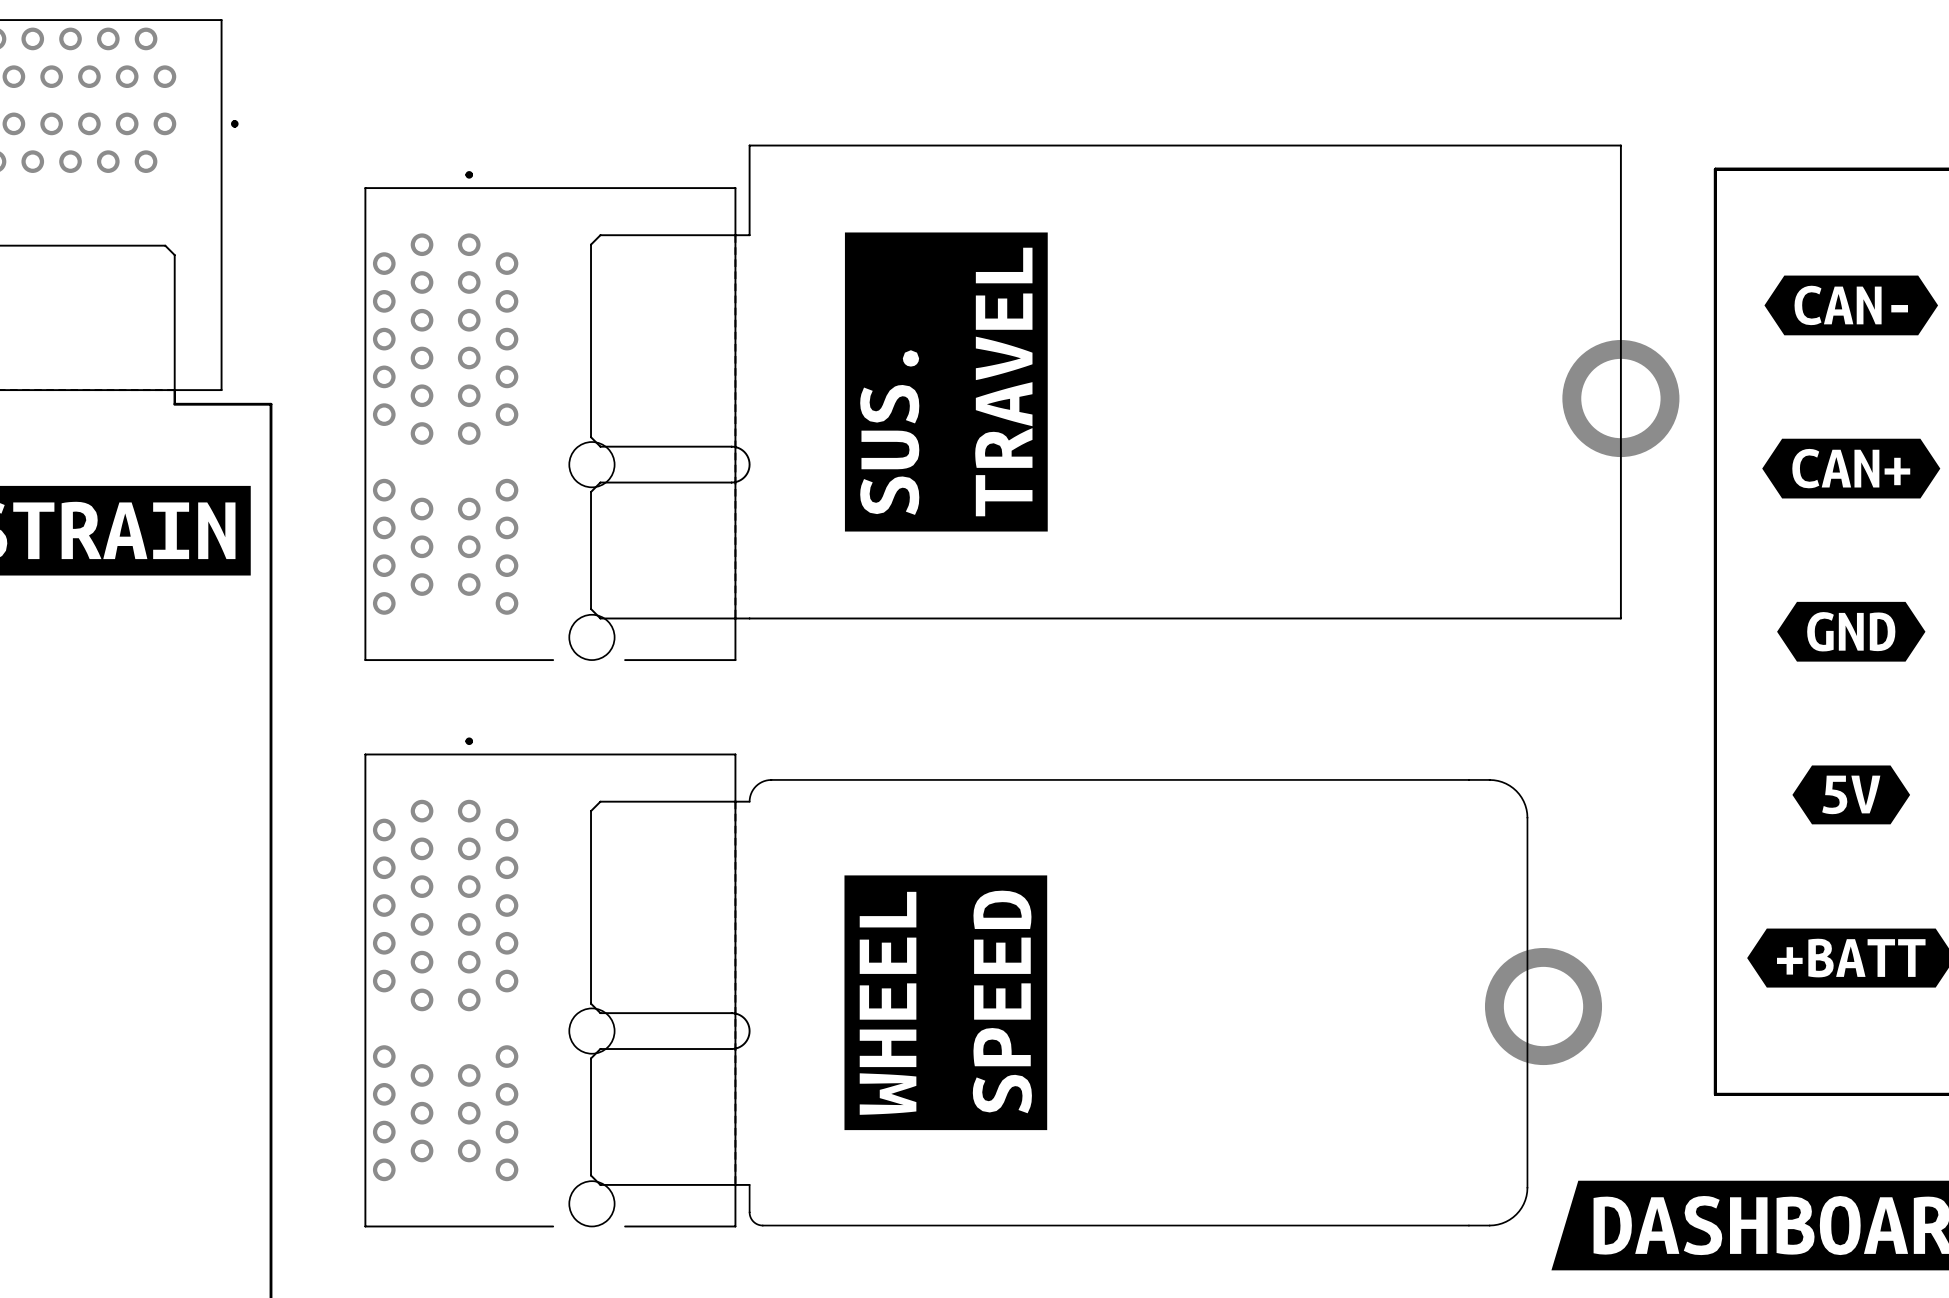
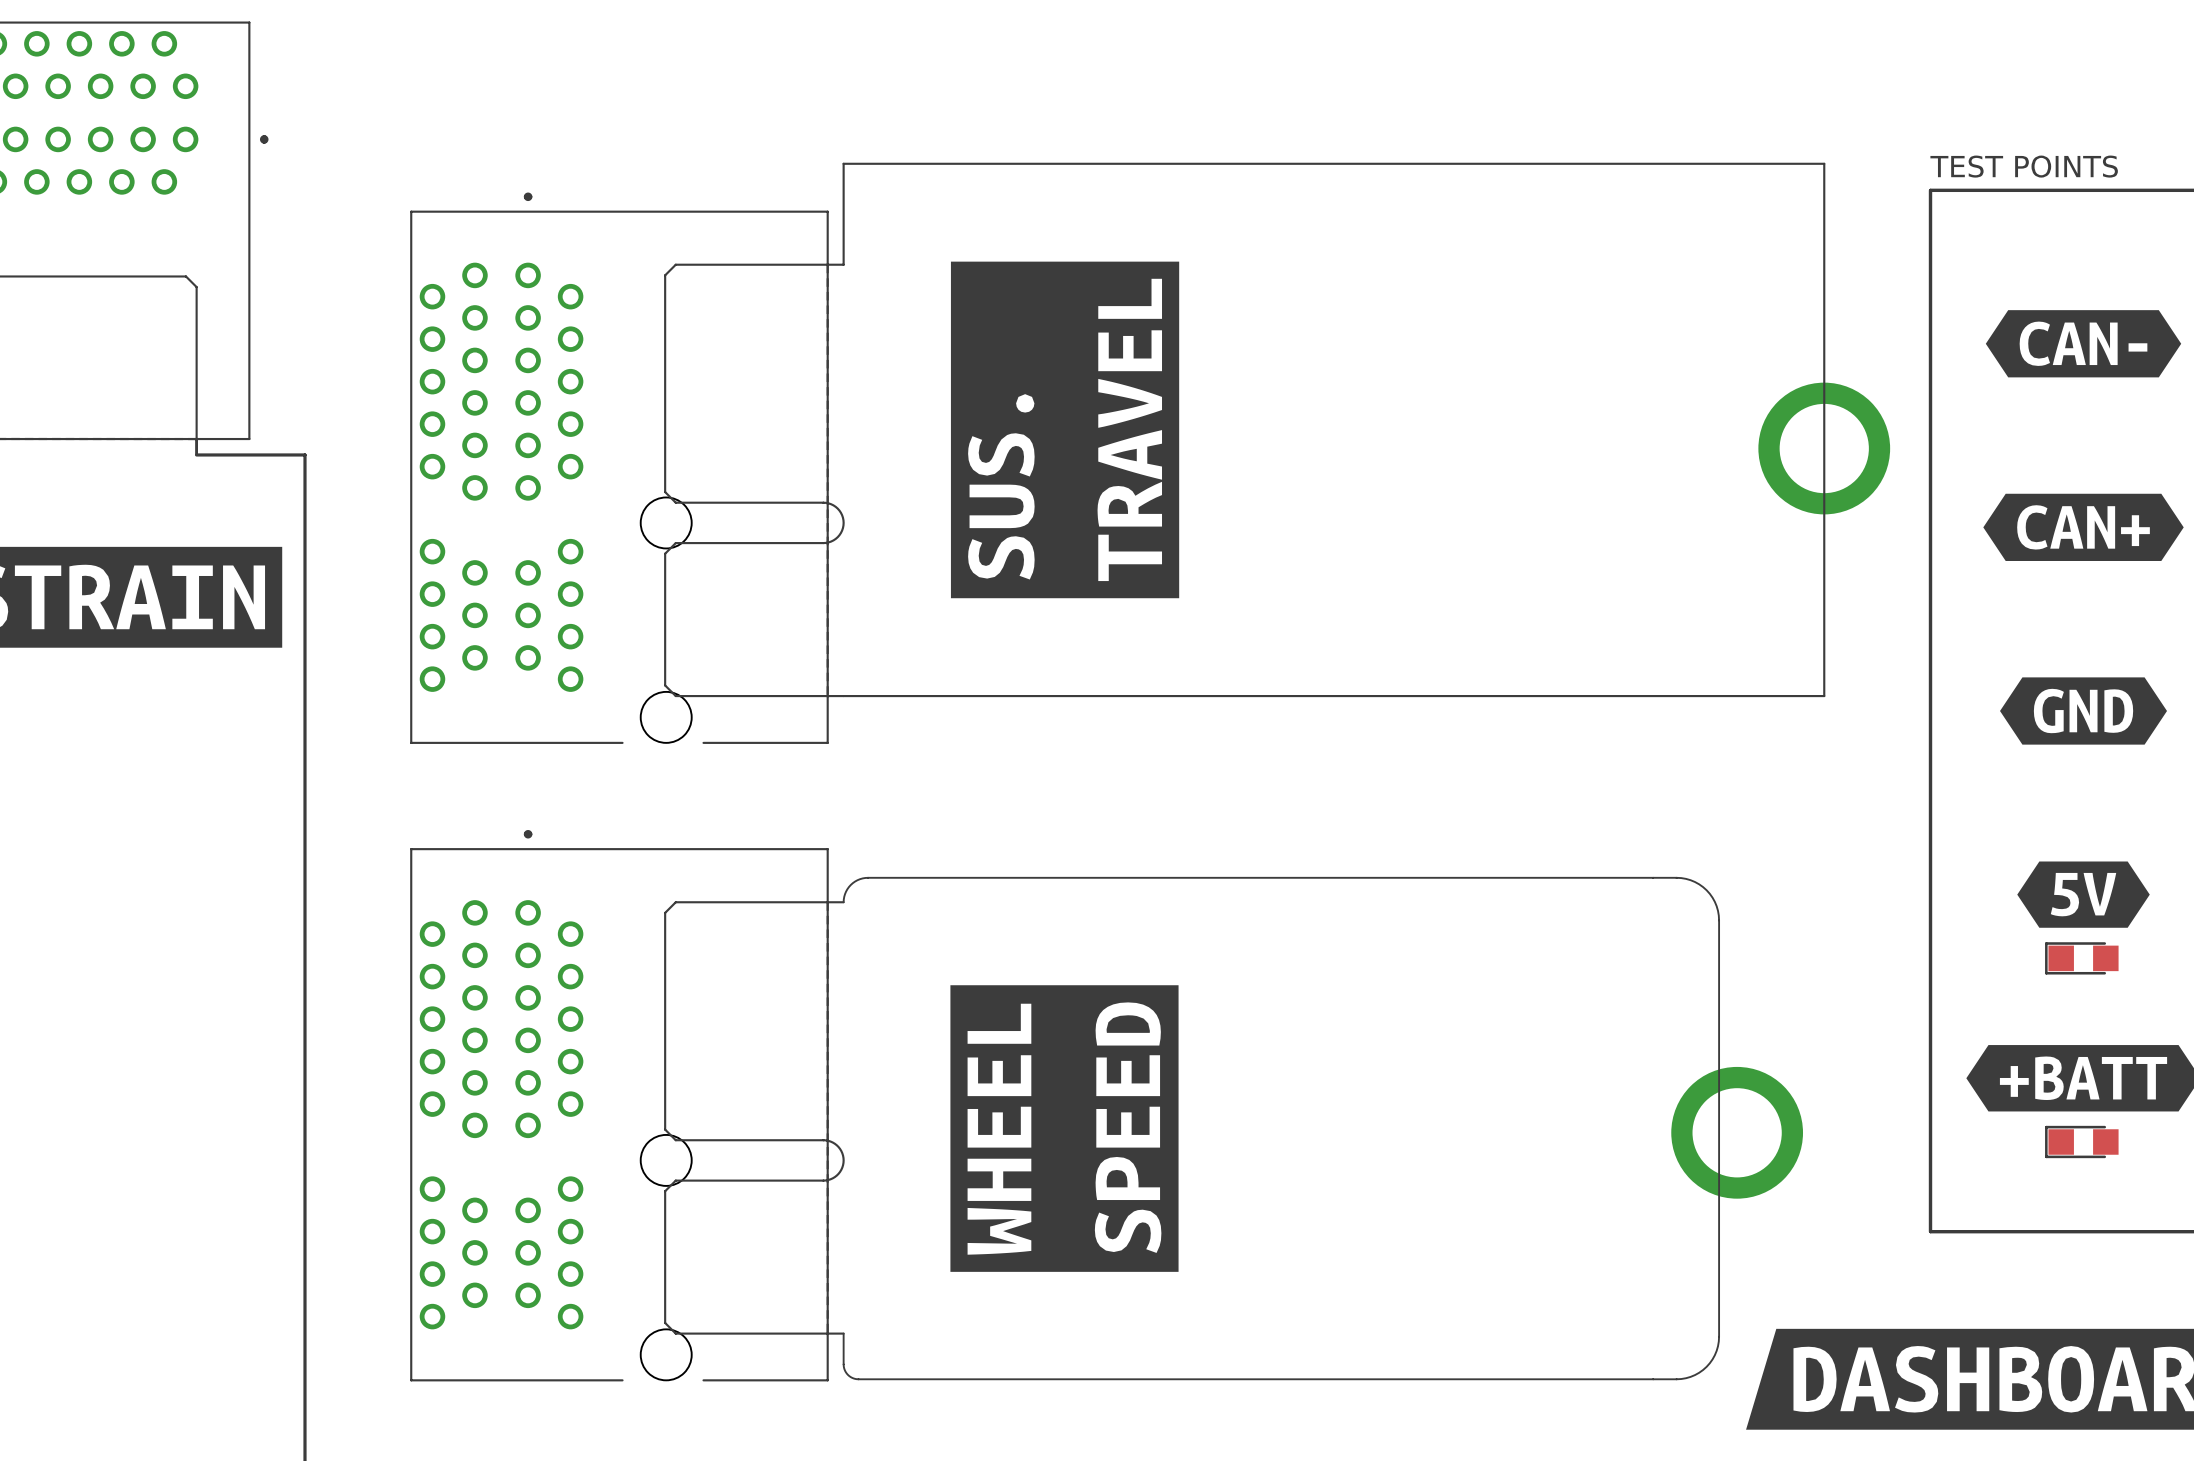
text: none -> TEST POINTS (2024, 166)
part: none -> (2081, 958)
part: none -> (2081, 1142)

